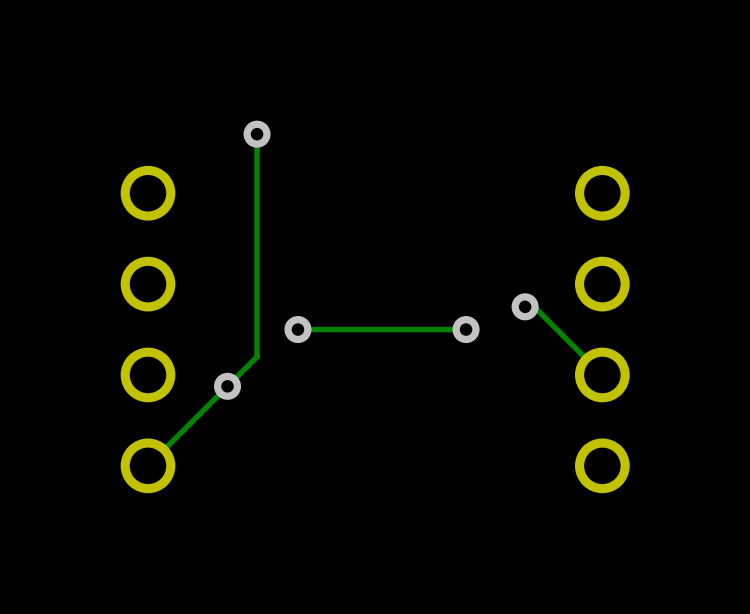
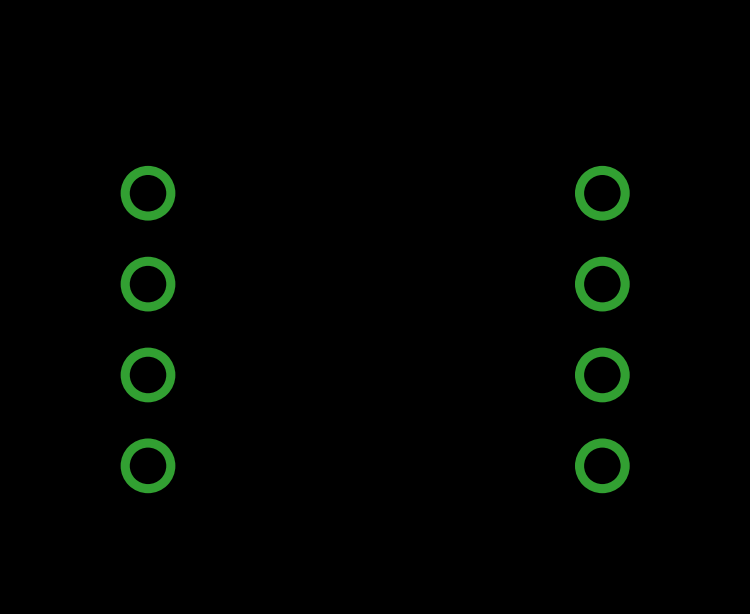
track: (257, 134) (257, 356) (148, 465) -> none
via: (257, 134) -> none
track: (525, 306) (534, 306) (602, 374) -> none
via: (525, 306) -> none
via: (297, 329) -> none
track: (466, 329) (297, 329) -> none
via: (466, 329) -> none
via: (227, 386) -> none

